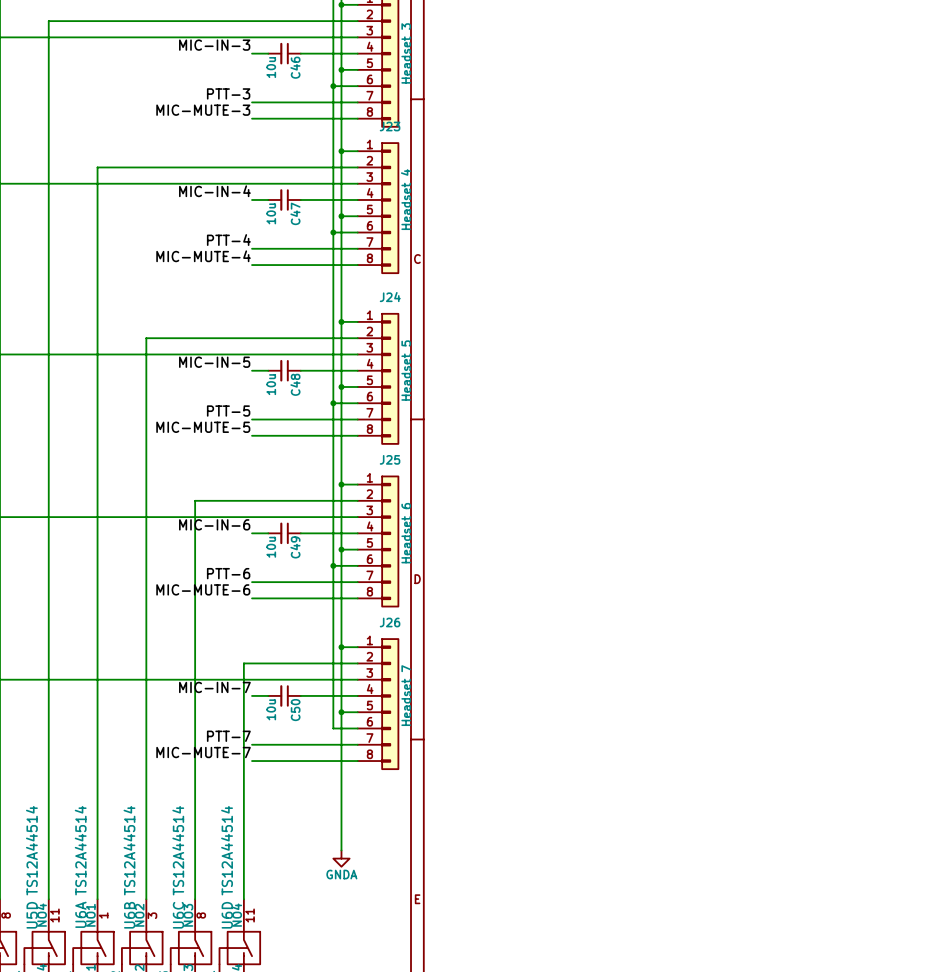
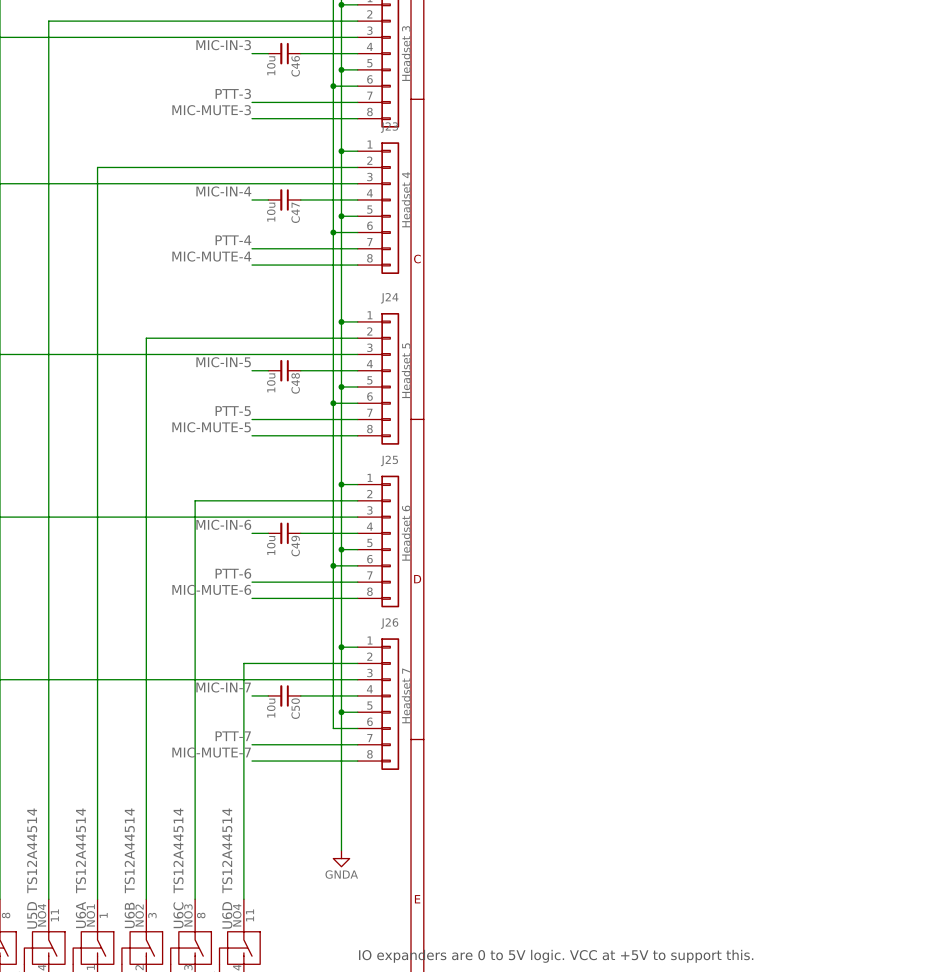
text: none -> IO expanders are 0 to 5V logic. VCC at +5V to support this. (556, 956)

